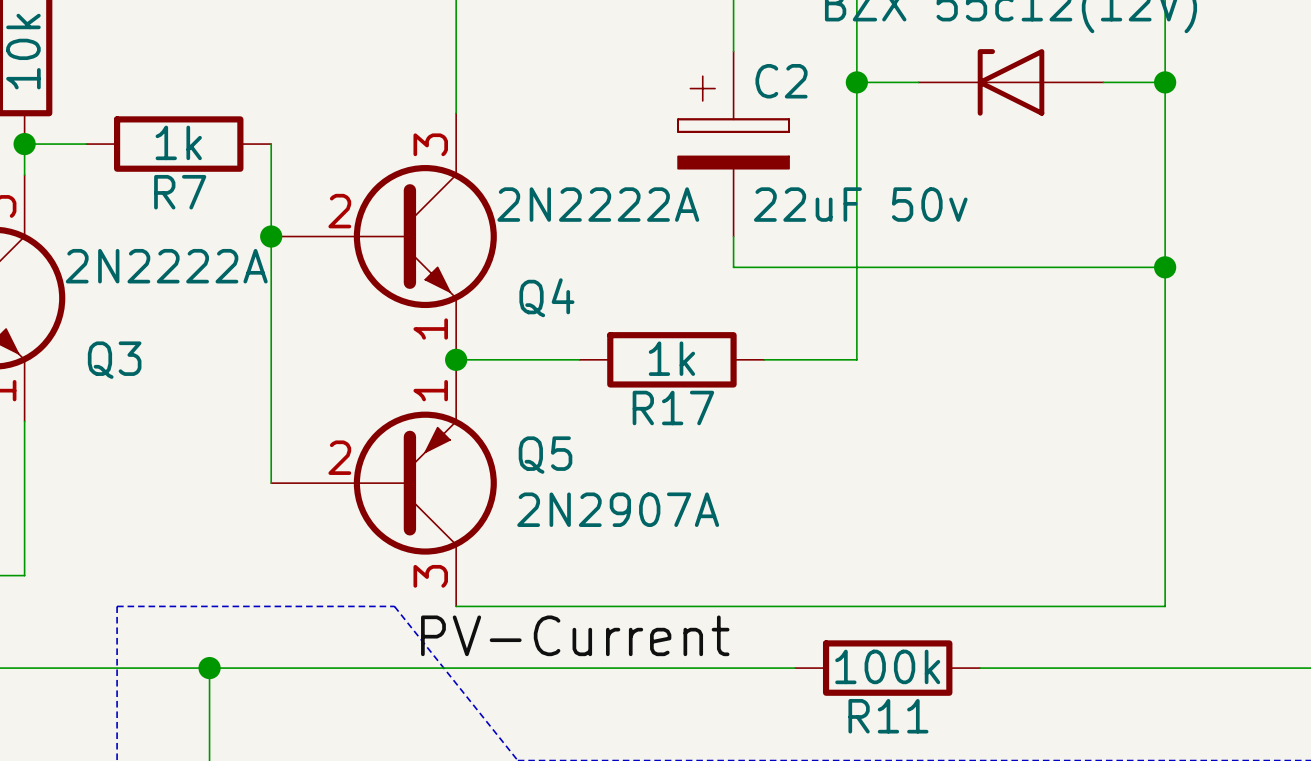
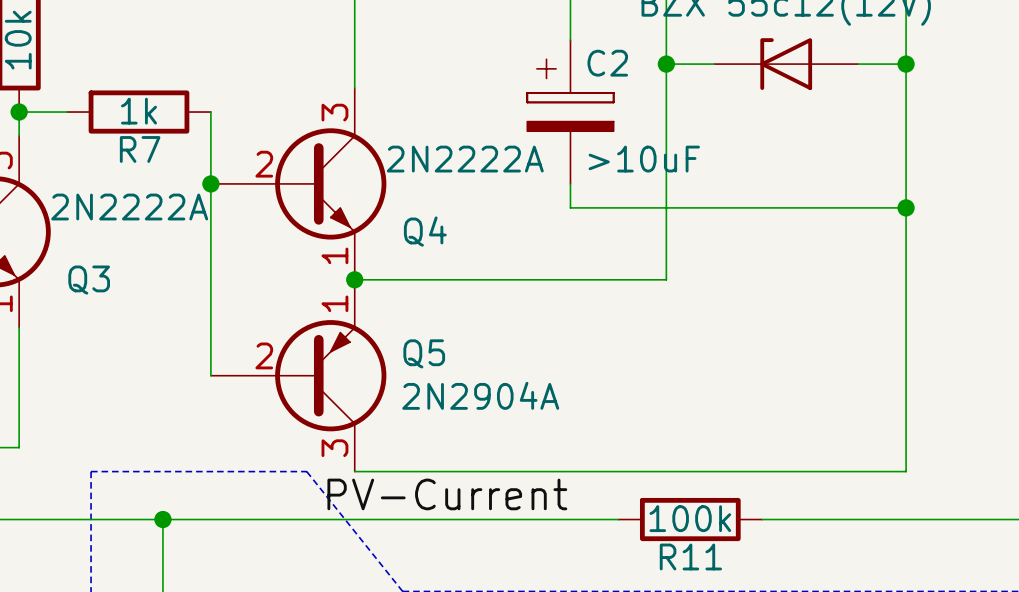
C2 value: 22uF 50v (860, 204) -> >10uF (644, 159)
wire: none -> (450, 279) (594, 279)
R17: 1k (671, 359) -> none
Q5 value: 2N2907A (618, 509) -> 2N2904A (480, 395)

